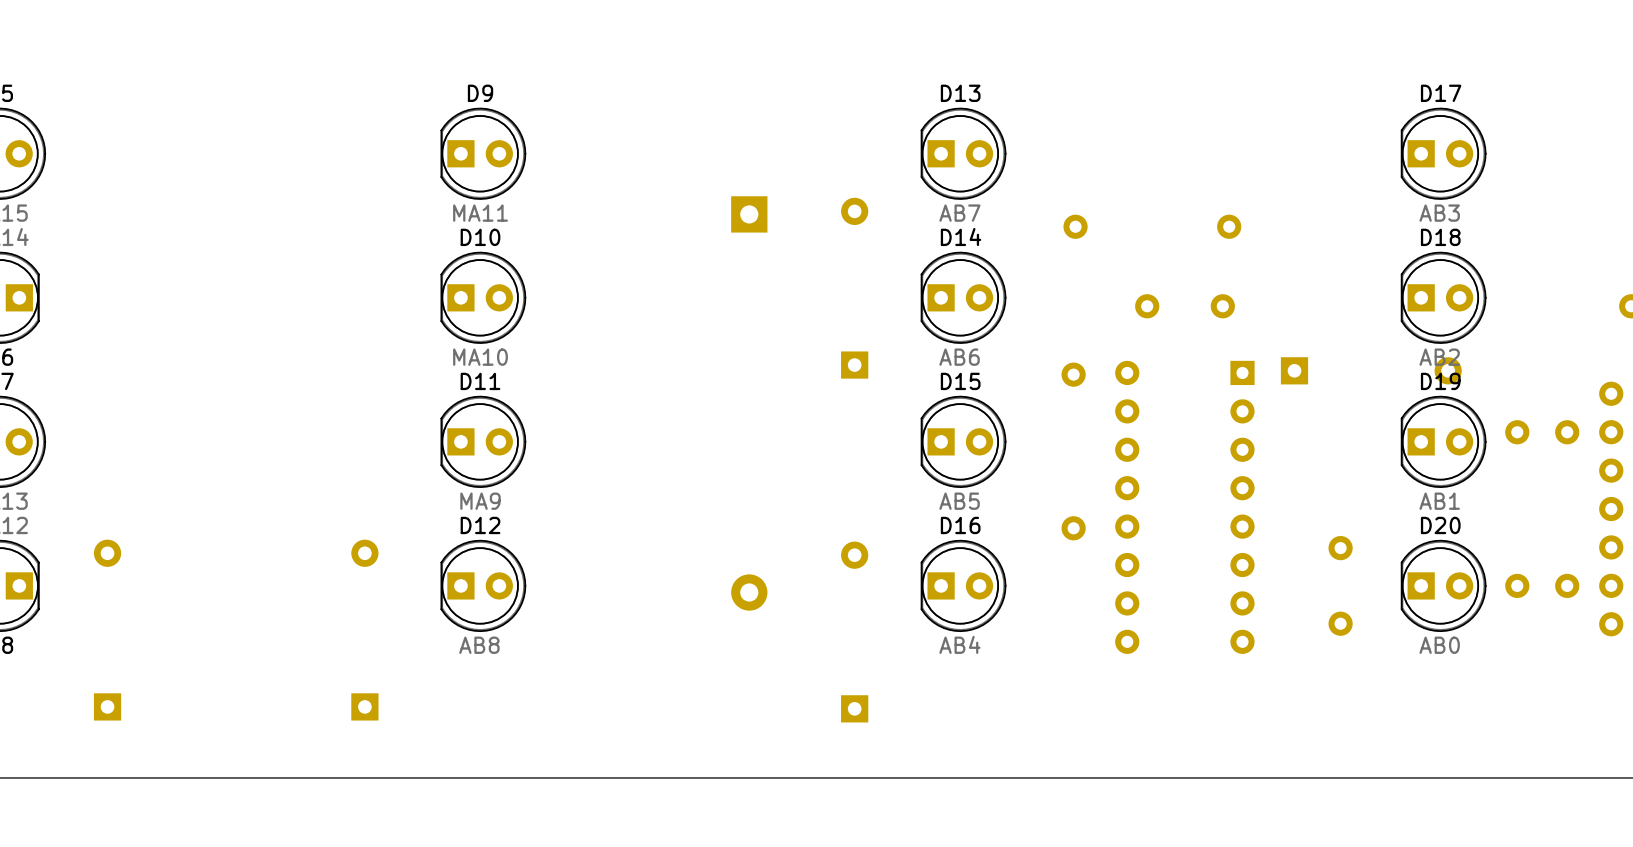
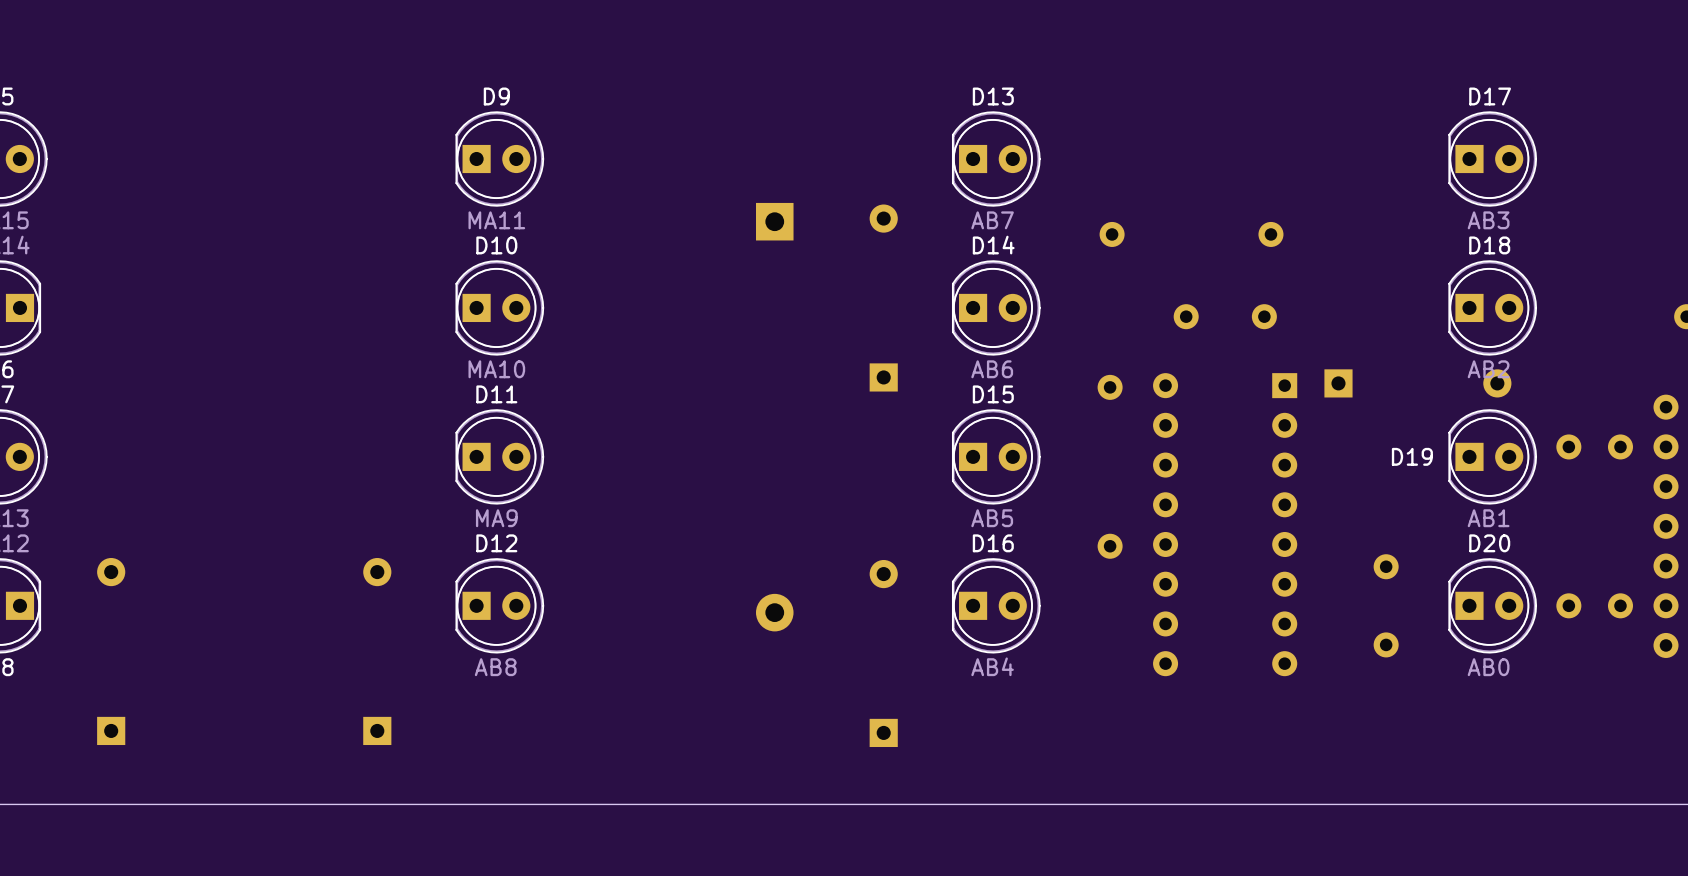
D19 name position: D19 (1440, 381) -> D19 (1412, 456)

